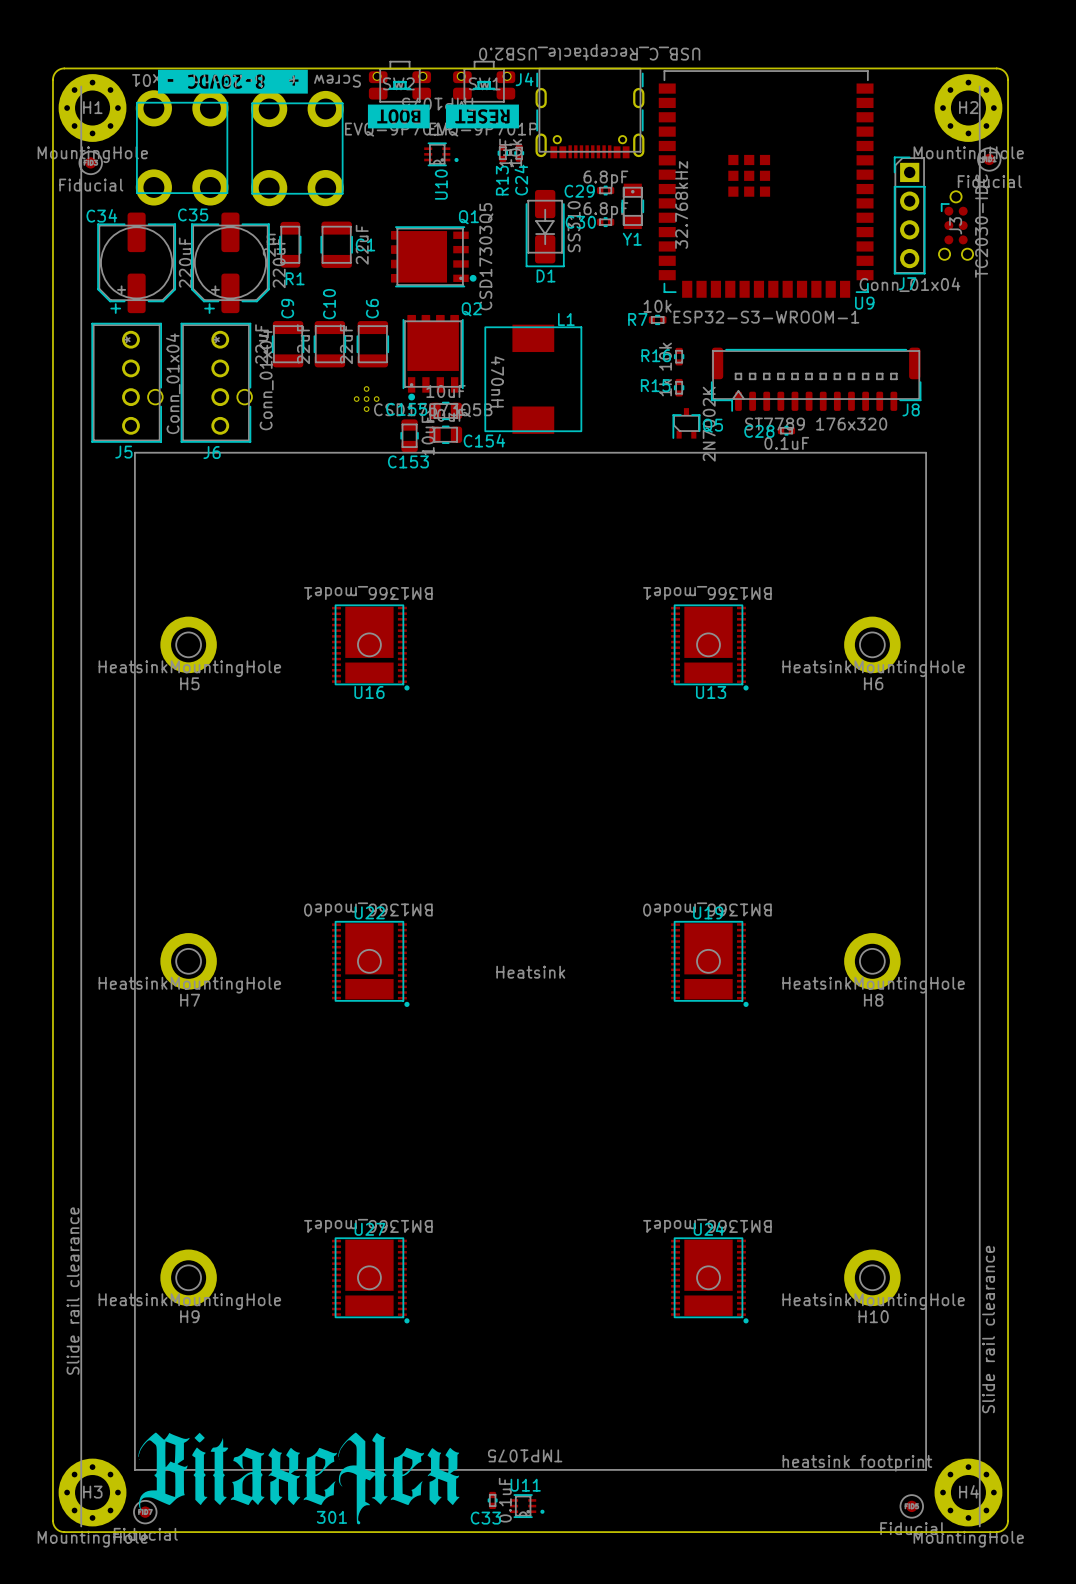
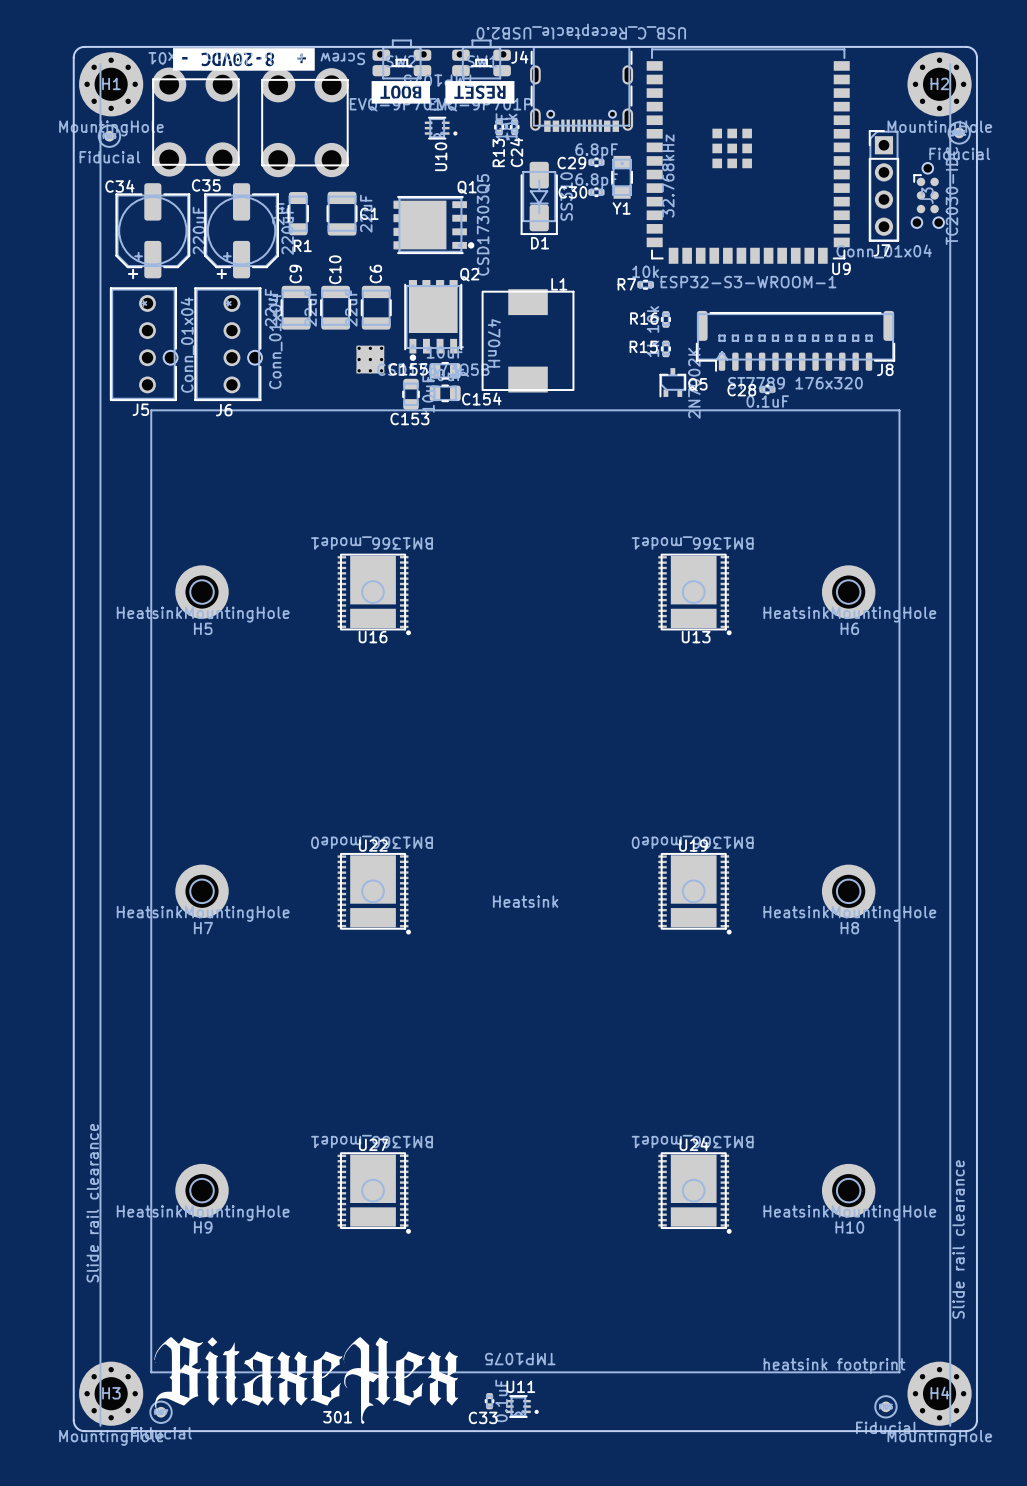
part footprint: [353, 386, 380, 412] -> [356, 345, 385, 374]

